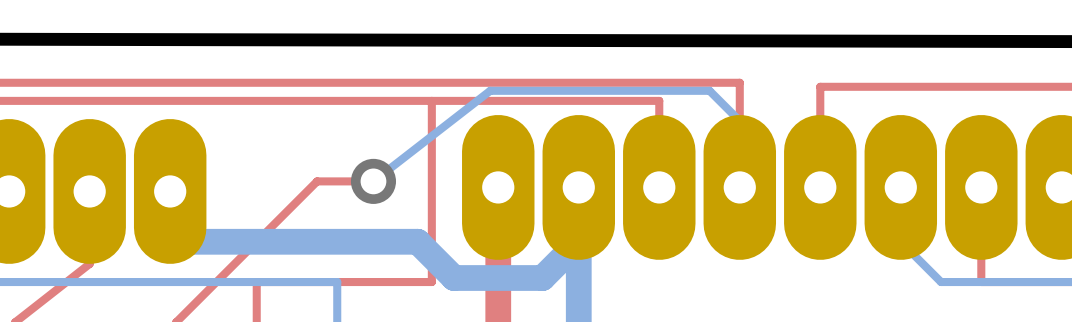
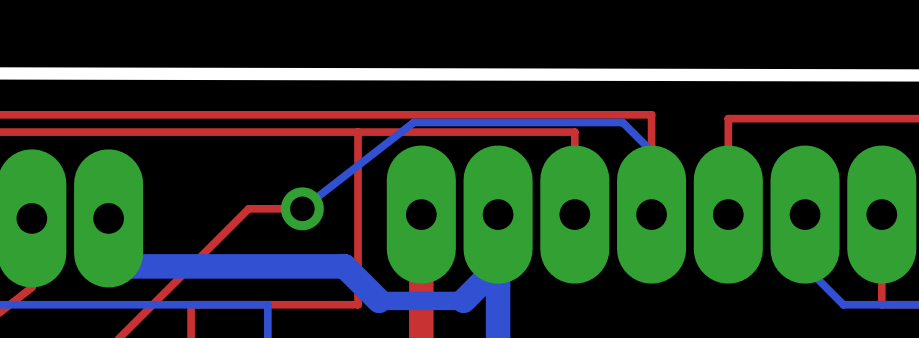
bottom track width: thick (542, 278) (453, 278) -> thin (463, 300) (379, 300)

